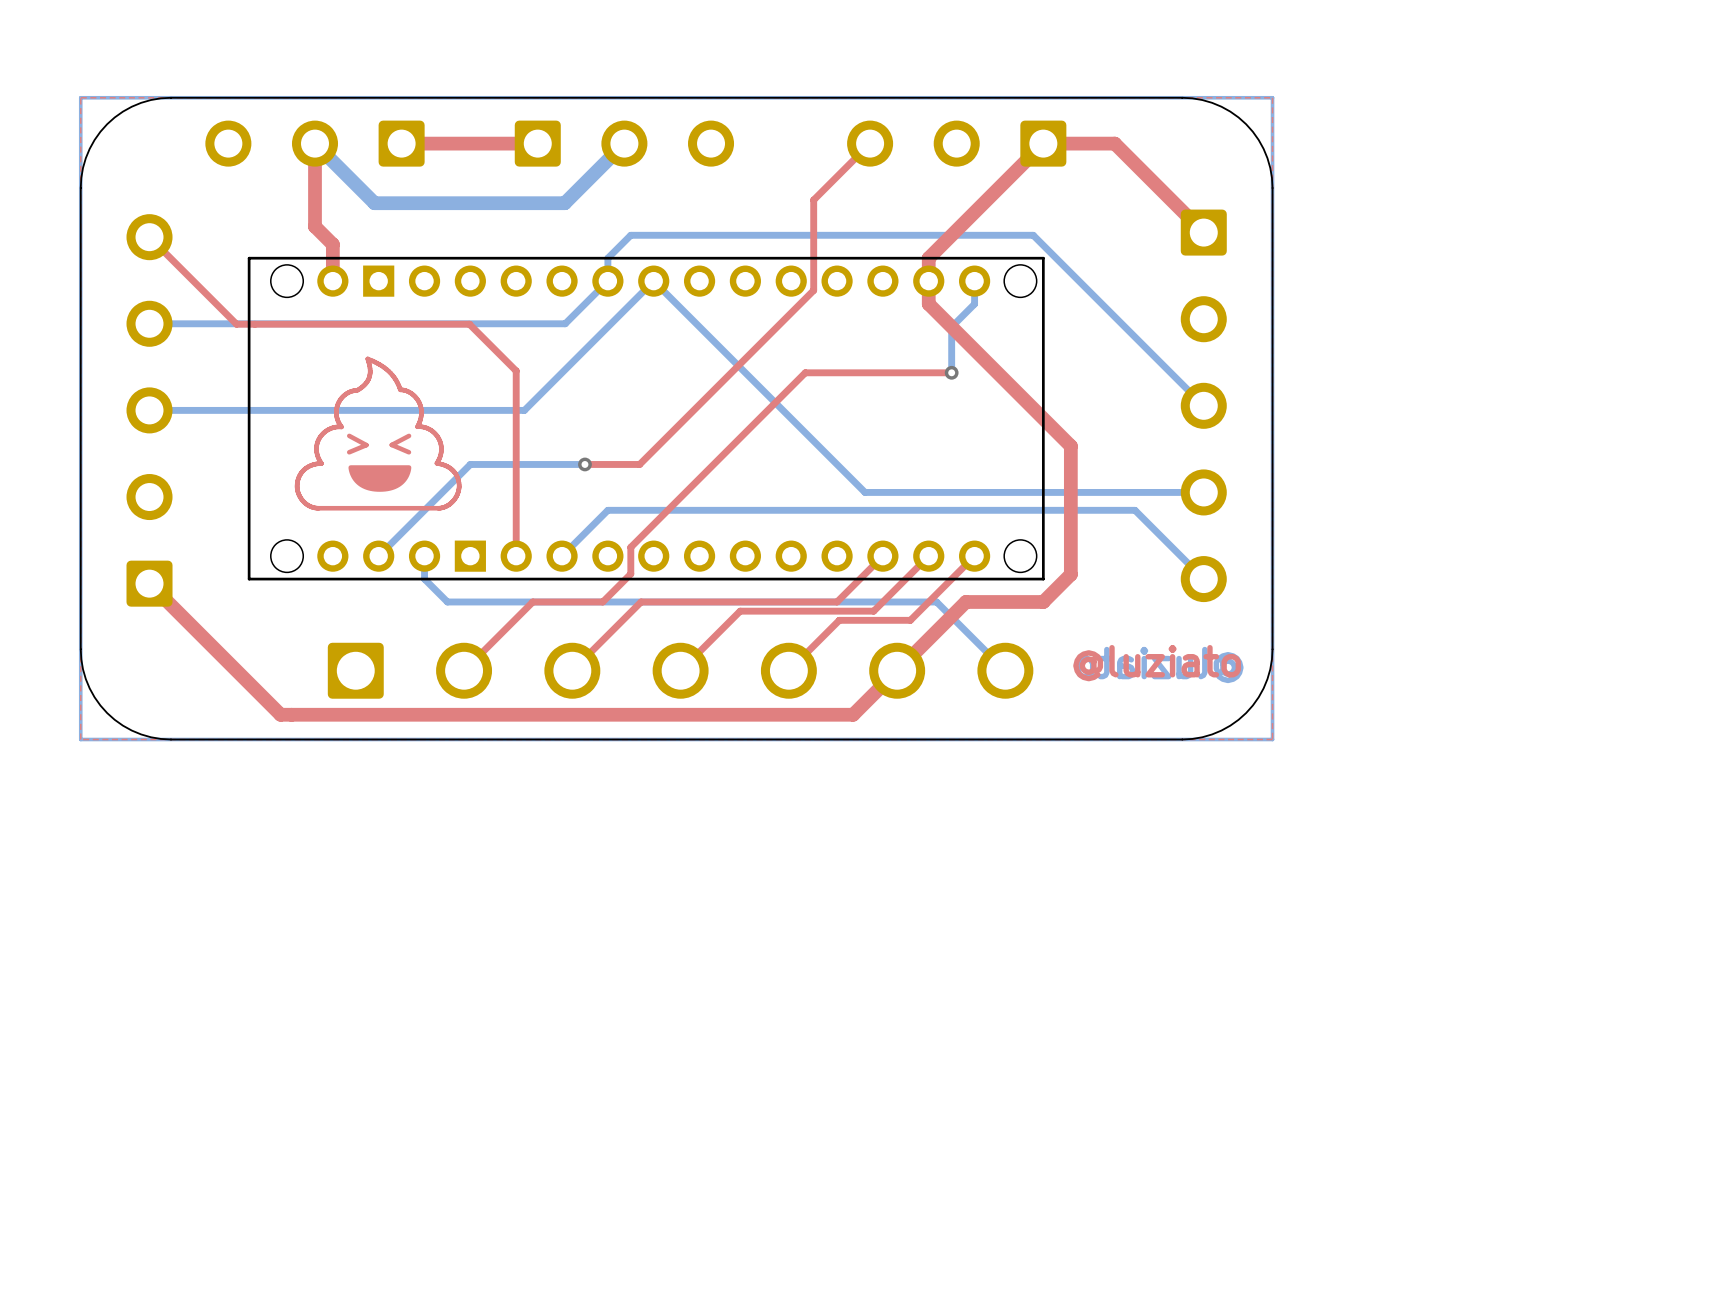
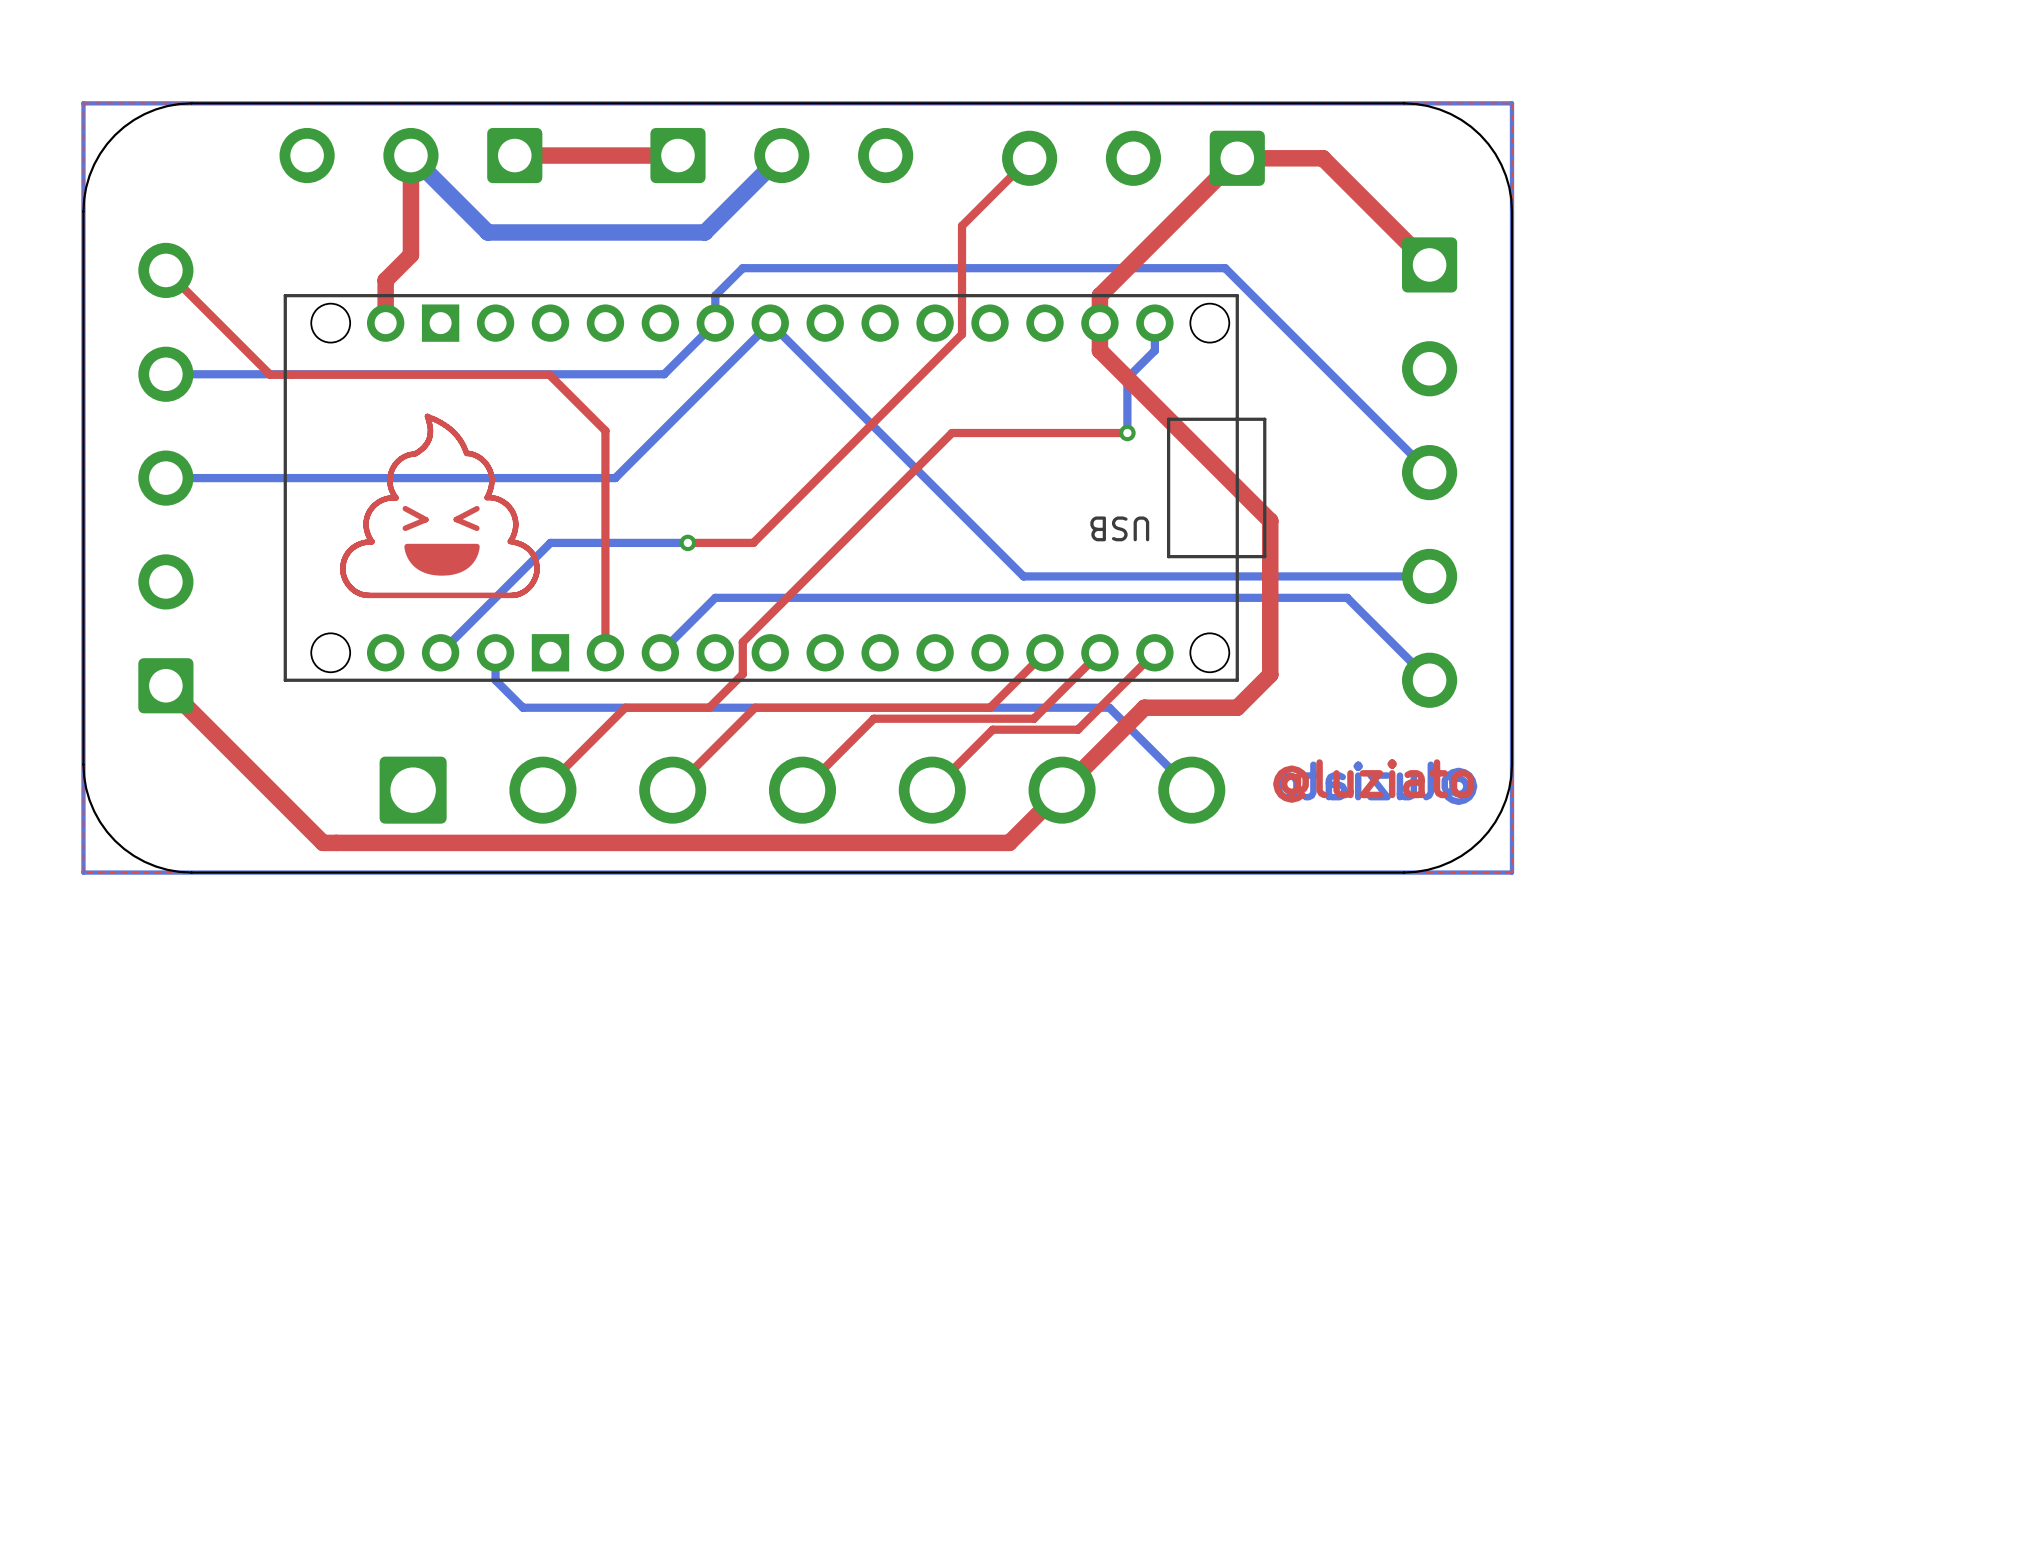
bottom track: none -> (410, 155) (487, 232) (704, 232) (781, 155)
top track: (314, 143) (314, 226) (332, 245) -> (410, 155) (410, 255) (385, 280)
bottom track: (314, 143) (374, 203) (564, 203) (624, 143) -> none
part position: (314, 143) -> (410, 155)
top track: (401, 143) (537, 143) -> (514, 155) (677, 155)
part position: (624, 143) -> (781, 155)
line: none -> (1168, 419) (1264, 419) (1264, 556) (1168, 556) (1168, 419)
text: none -> USB (1119, 528)

